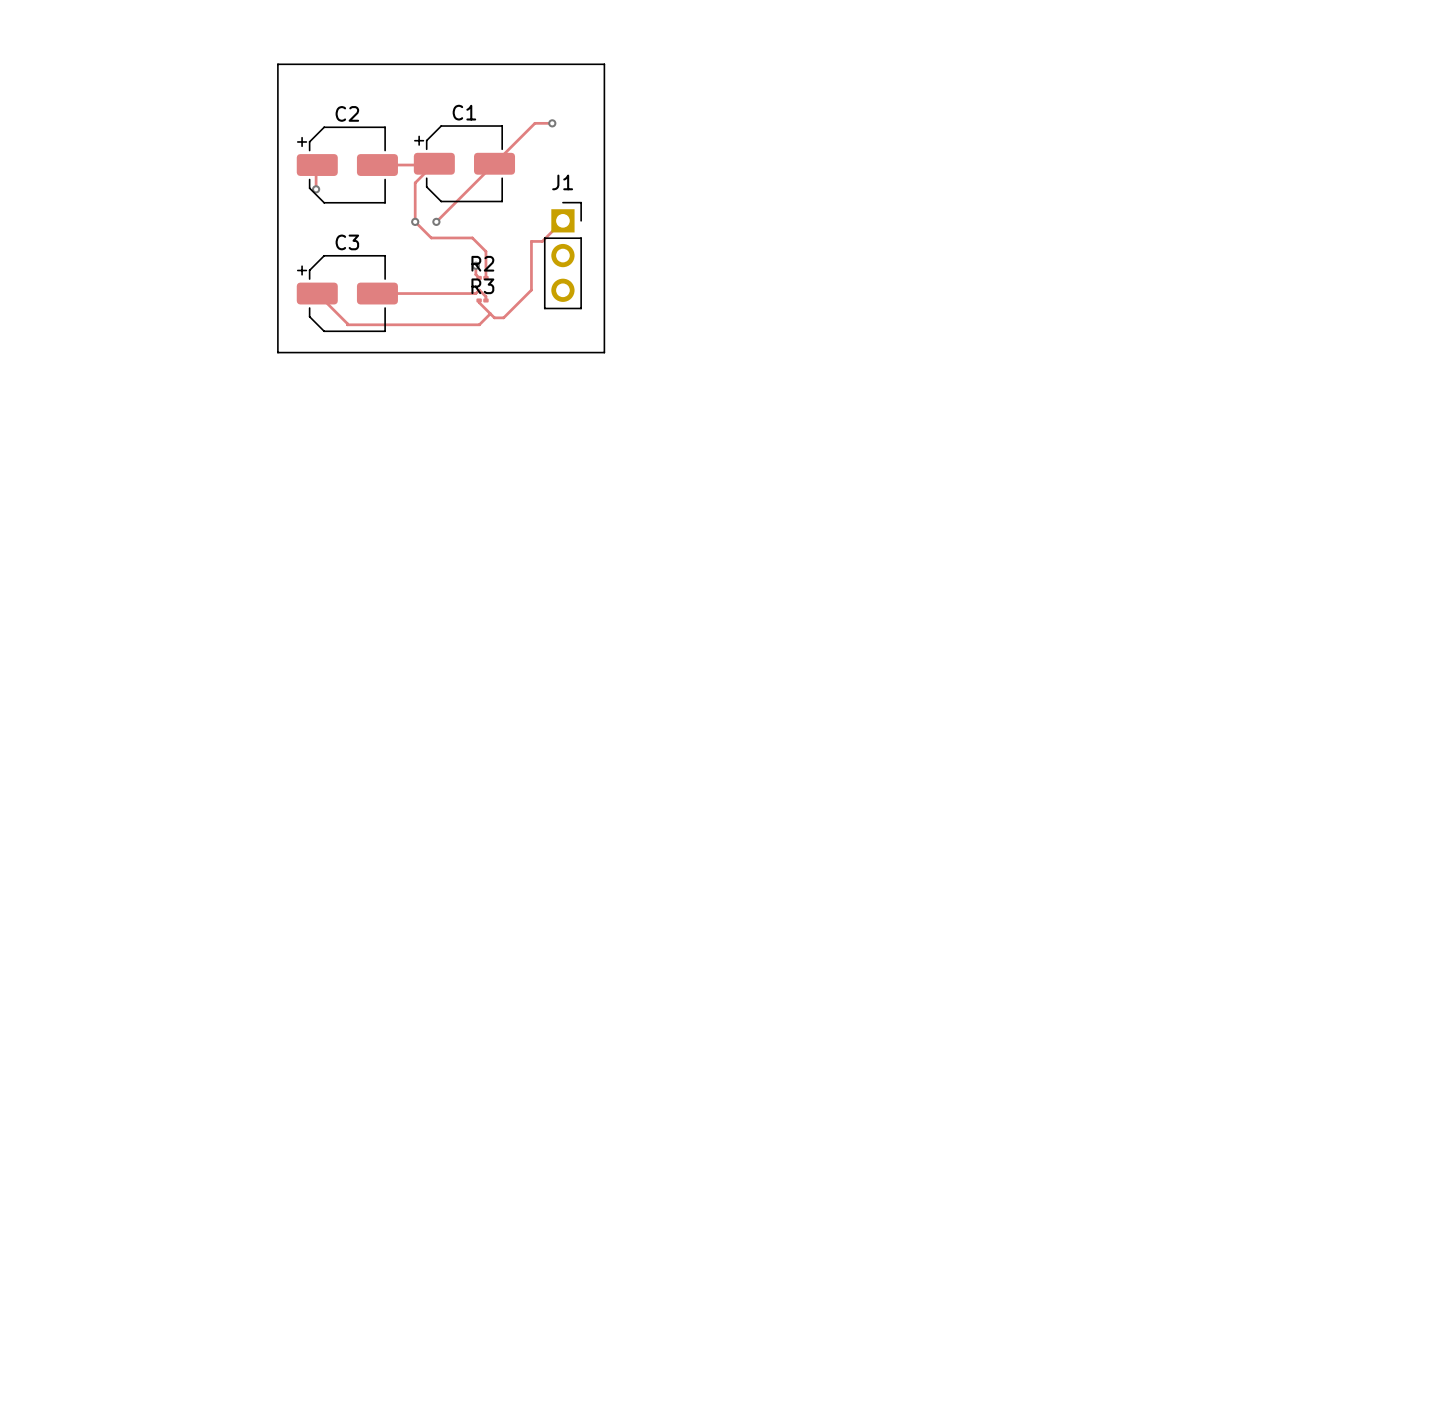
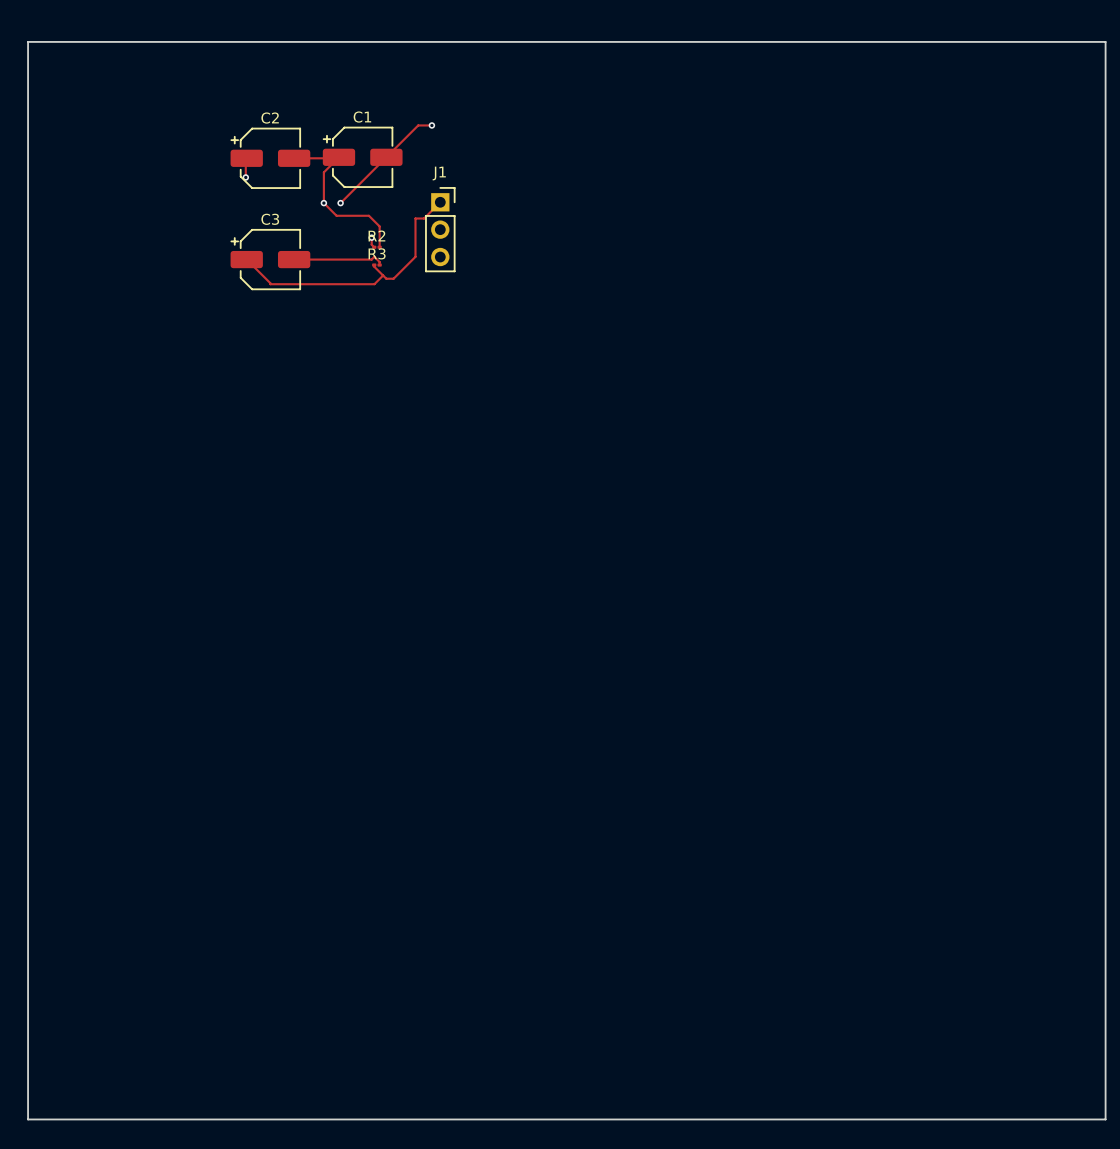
board edge: none -> (28, 41) (1105, 41) (1105, 1119) (28, 1119) (28, 41)
board edge: (277, 64) (604, 64) (604, 352) (277, 352) (277, 64) -> none

